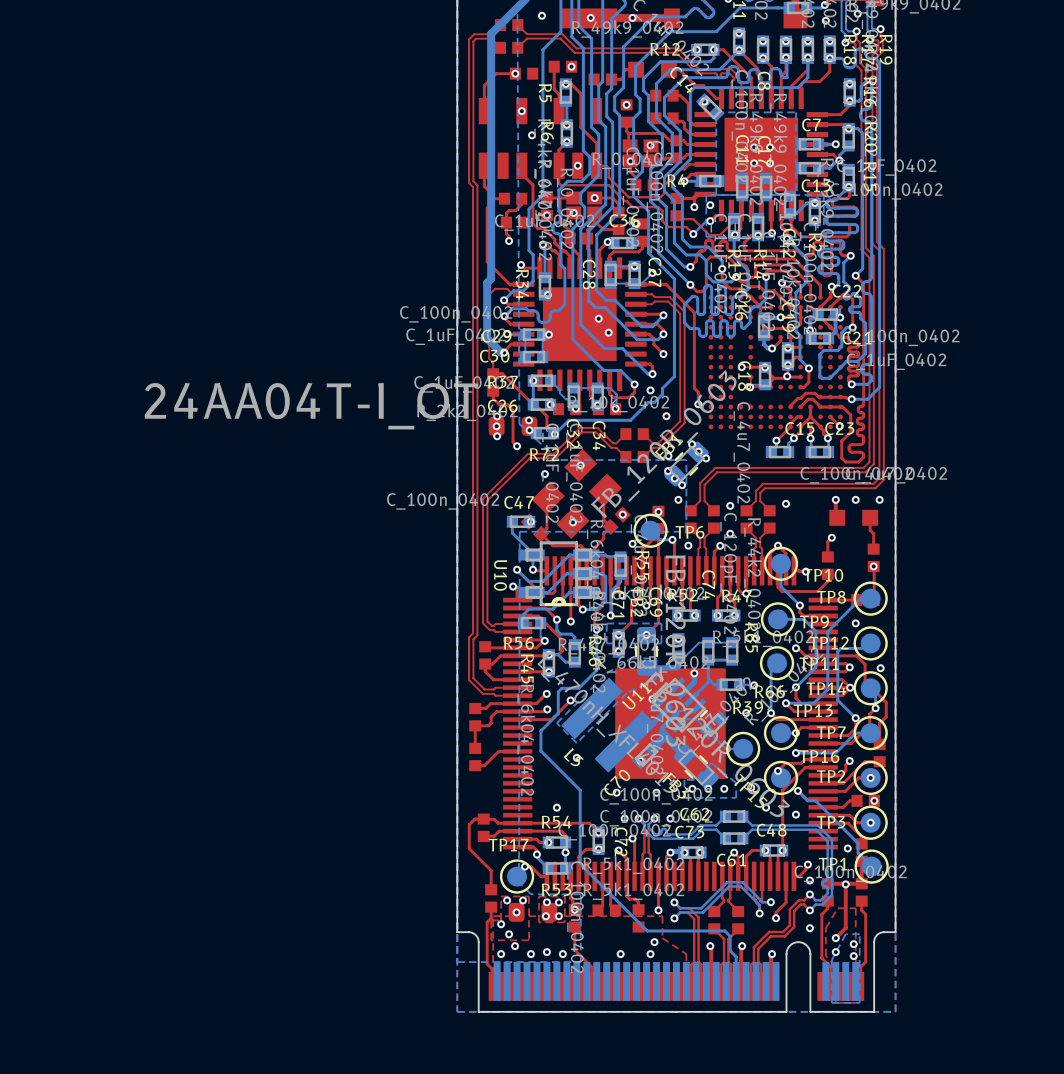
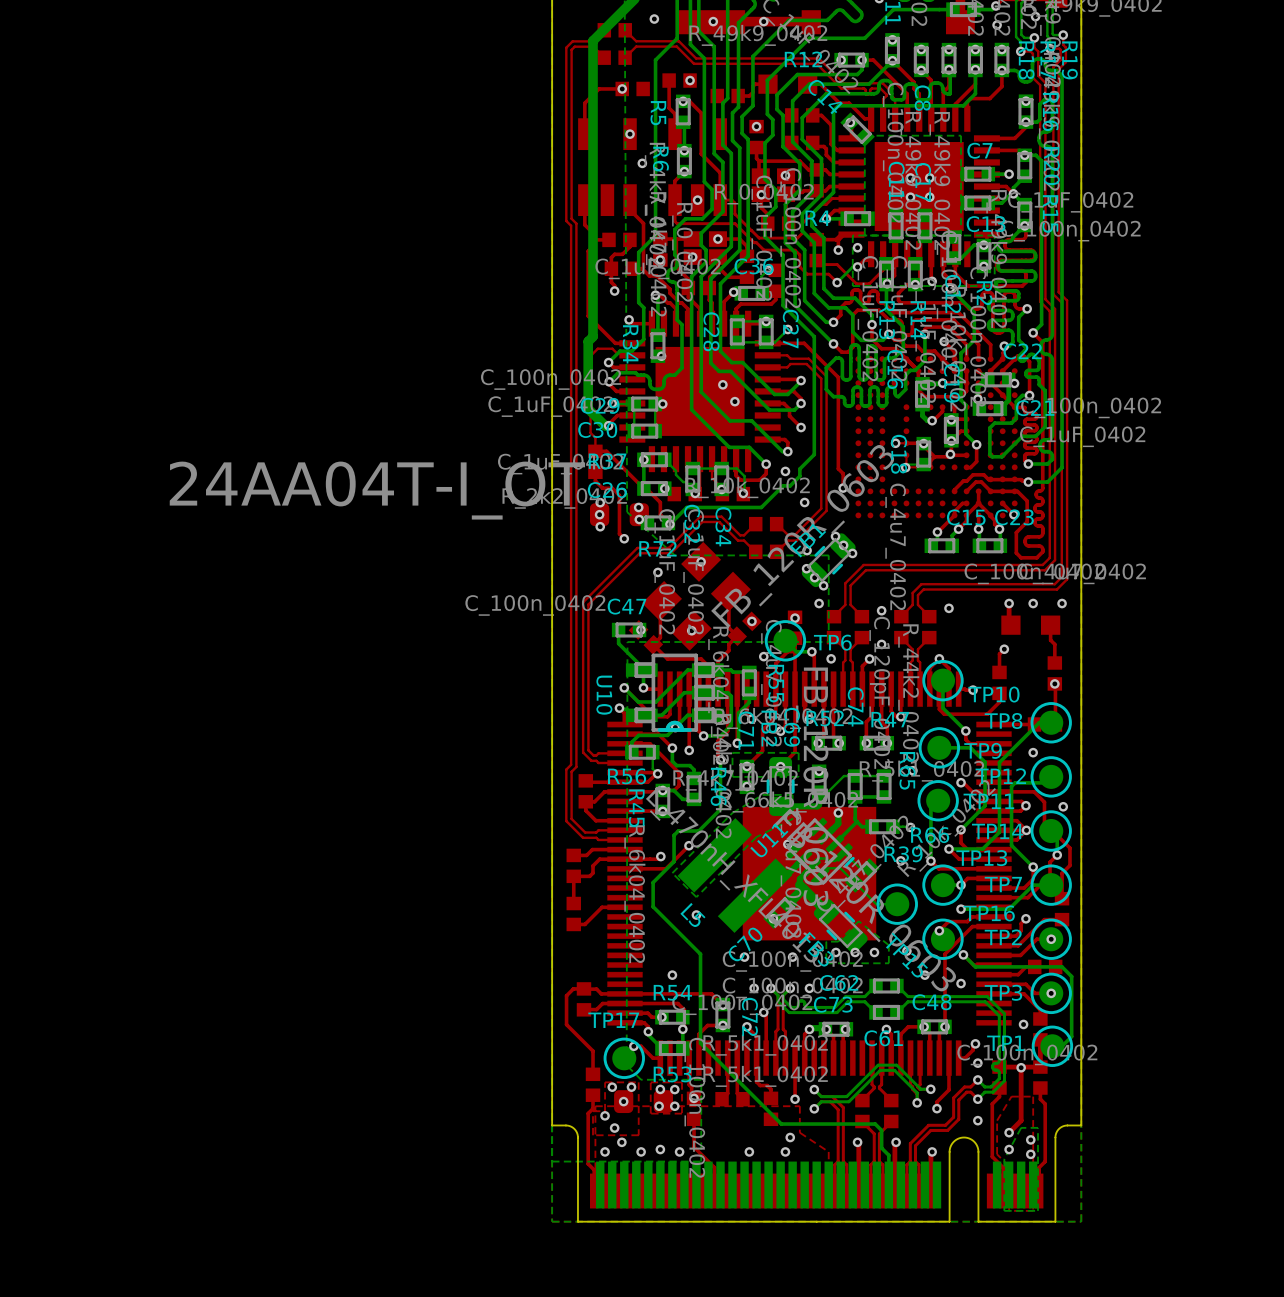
top track: (546, 693) (536, 703) (517, 703) -> none
via: (546, 693) -> none
bottom track: (815, 800) (858, 843) (858, 853) (871, 866) -> (984, 966) (1062, 966) (1071, 976) (1071, 1036) (1062, 1046) (1052, 1046)
via: (874, 800) -> none

